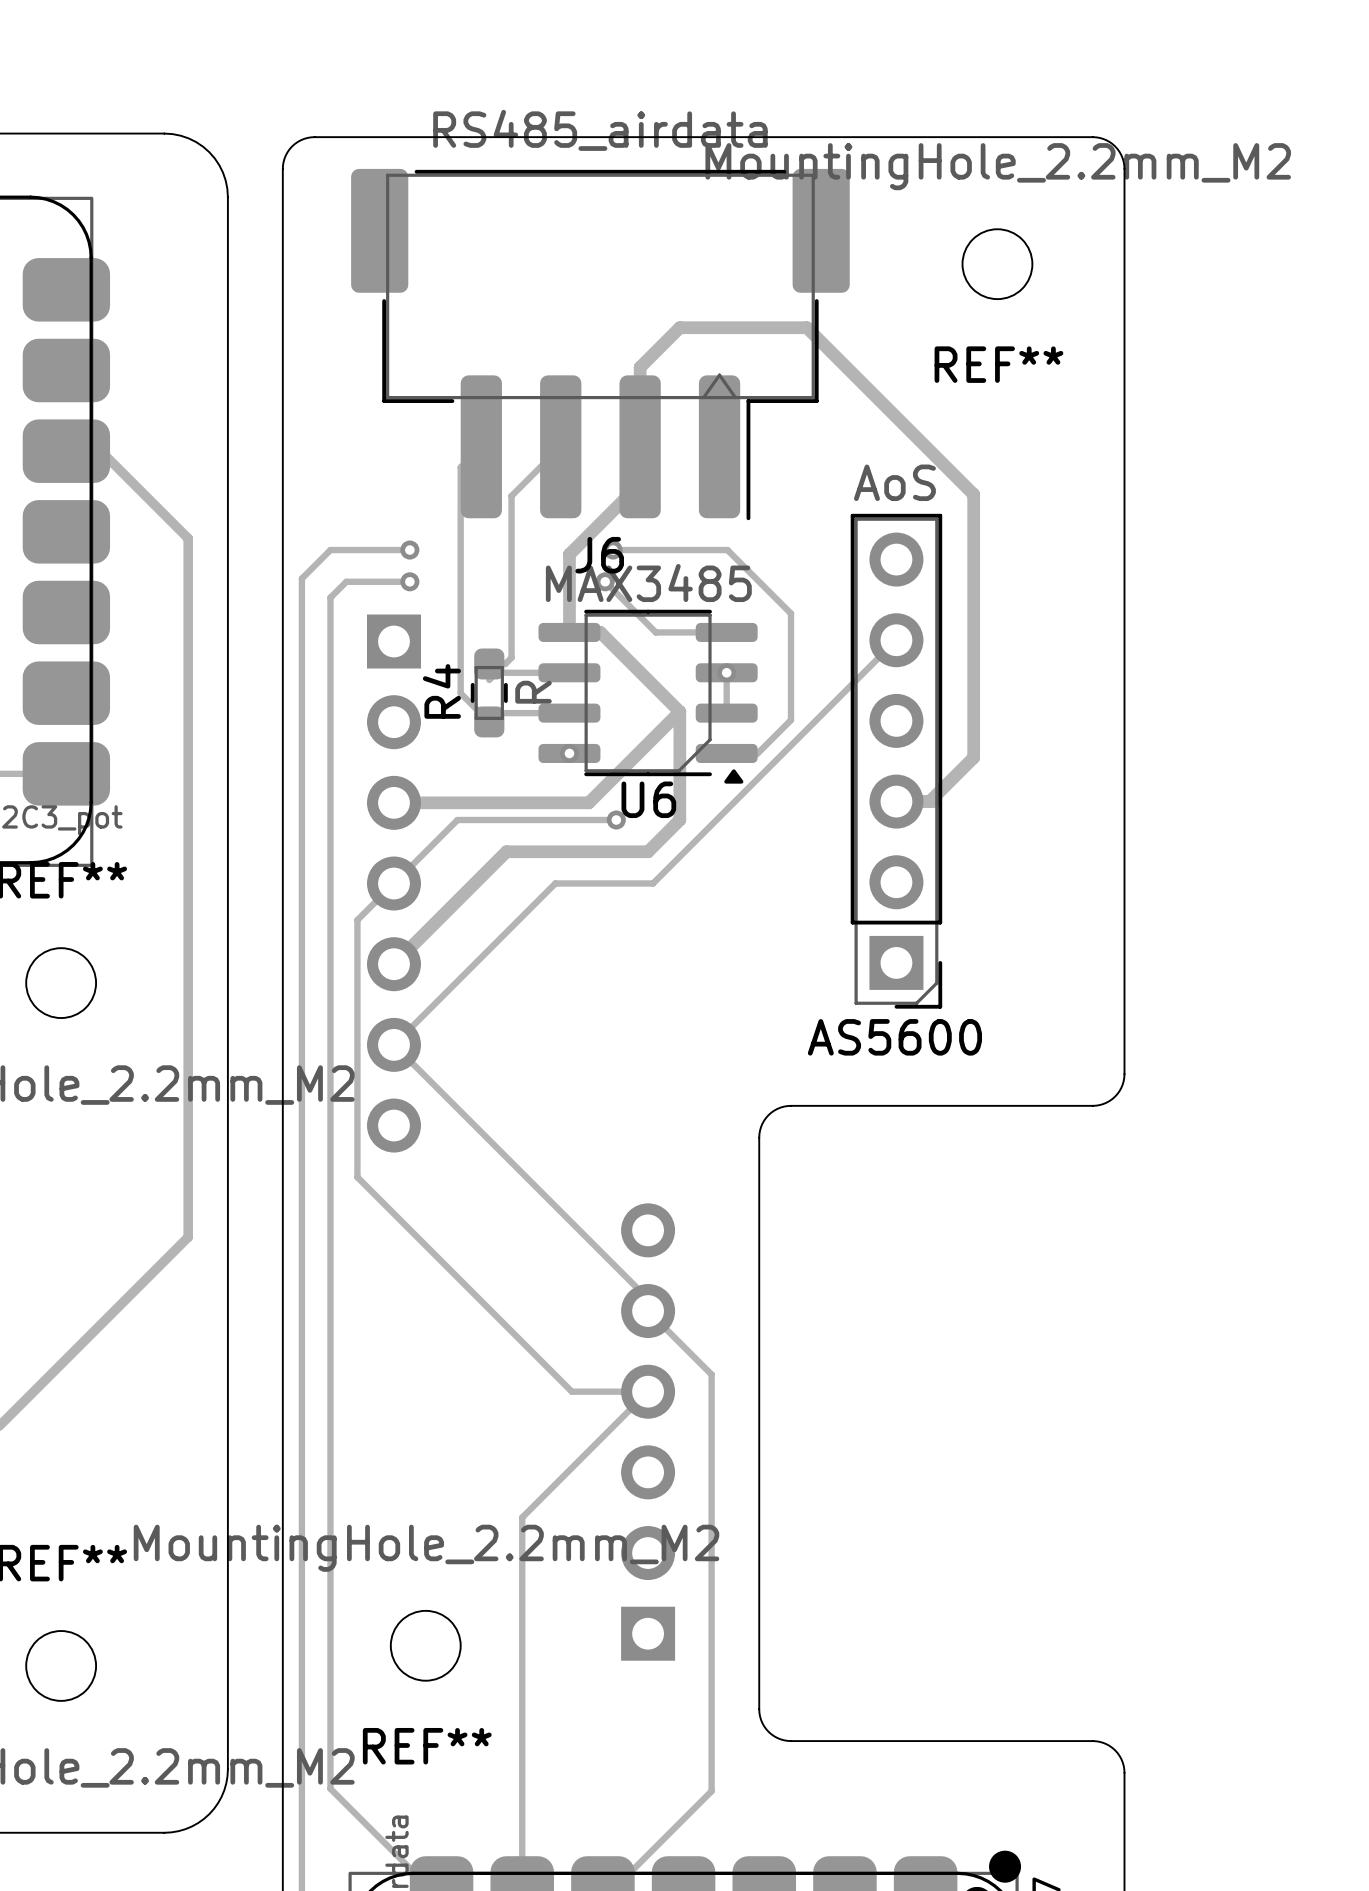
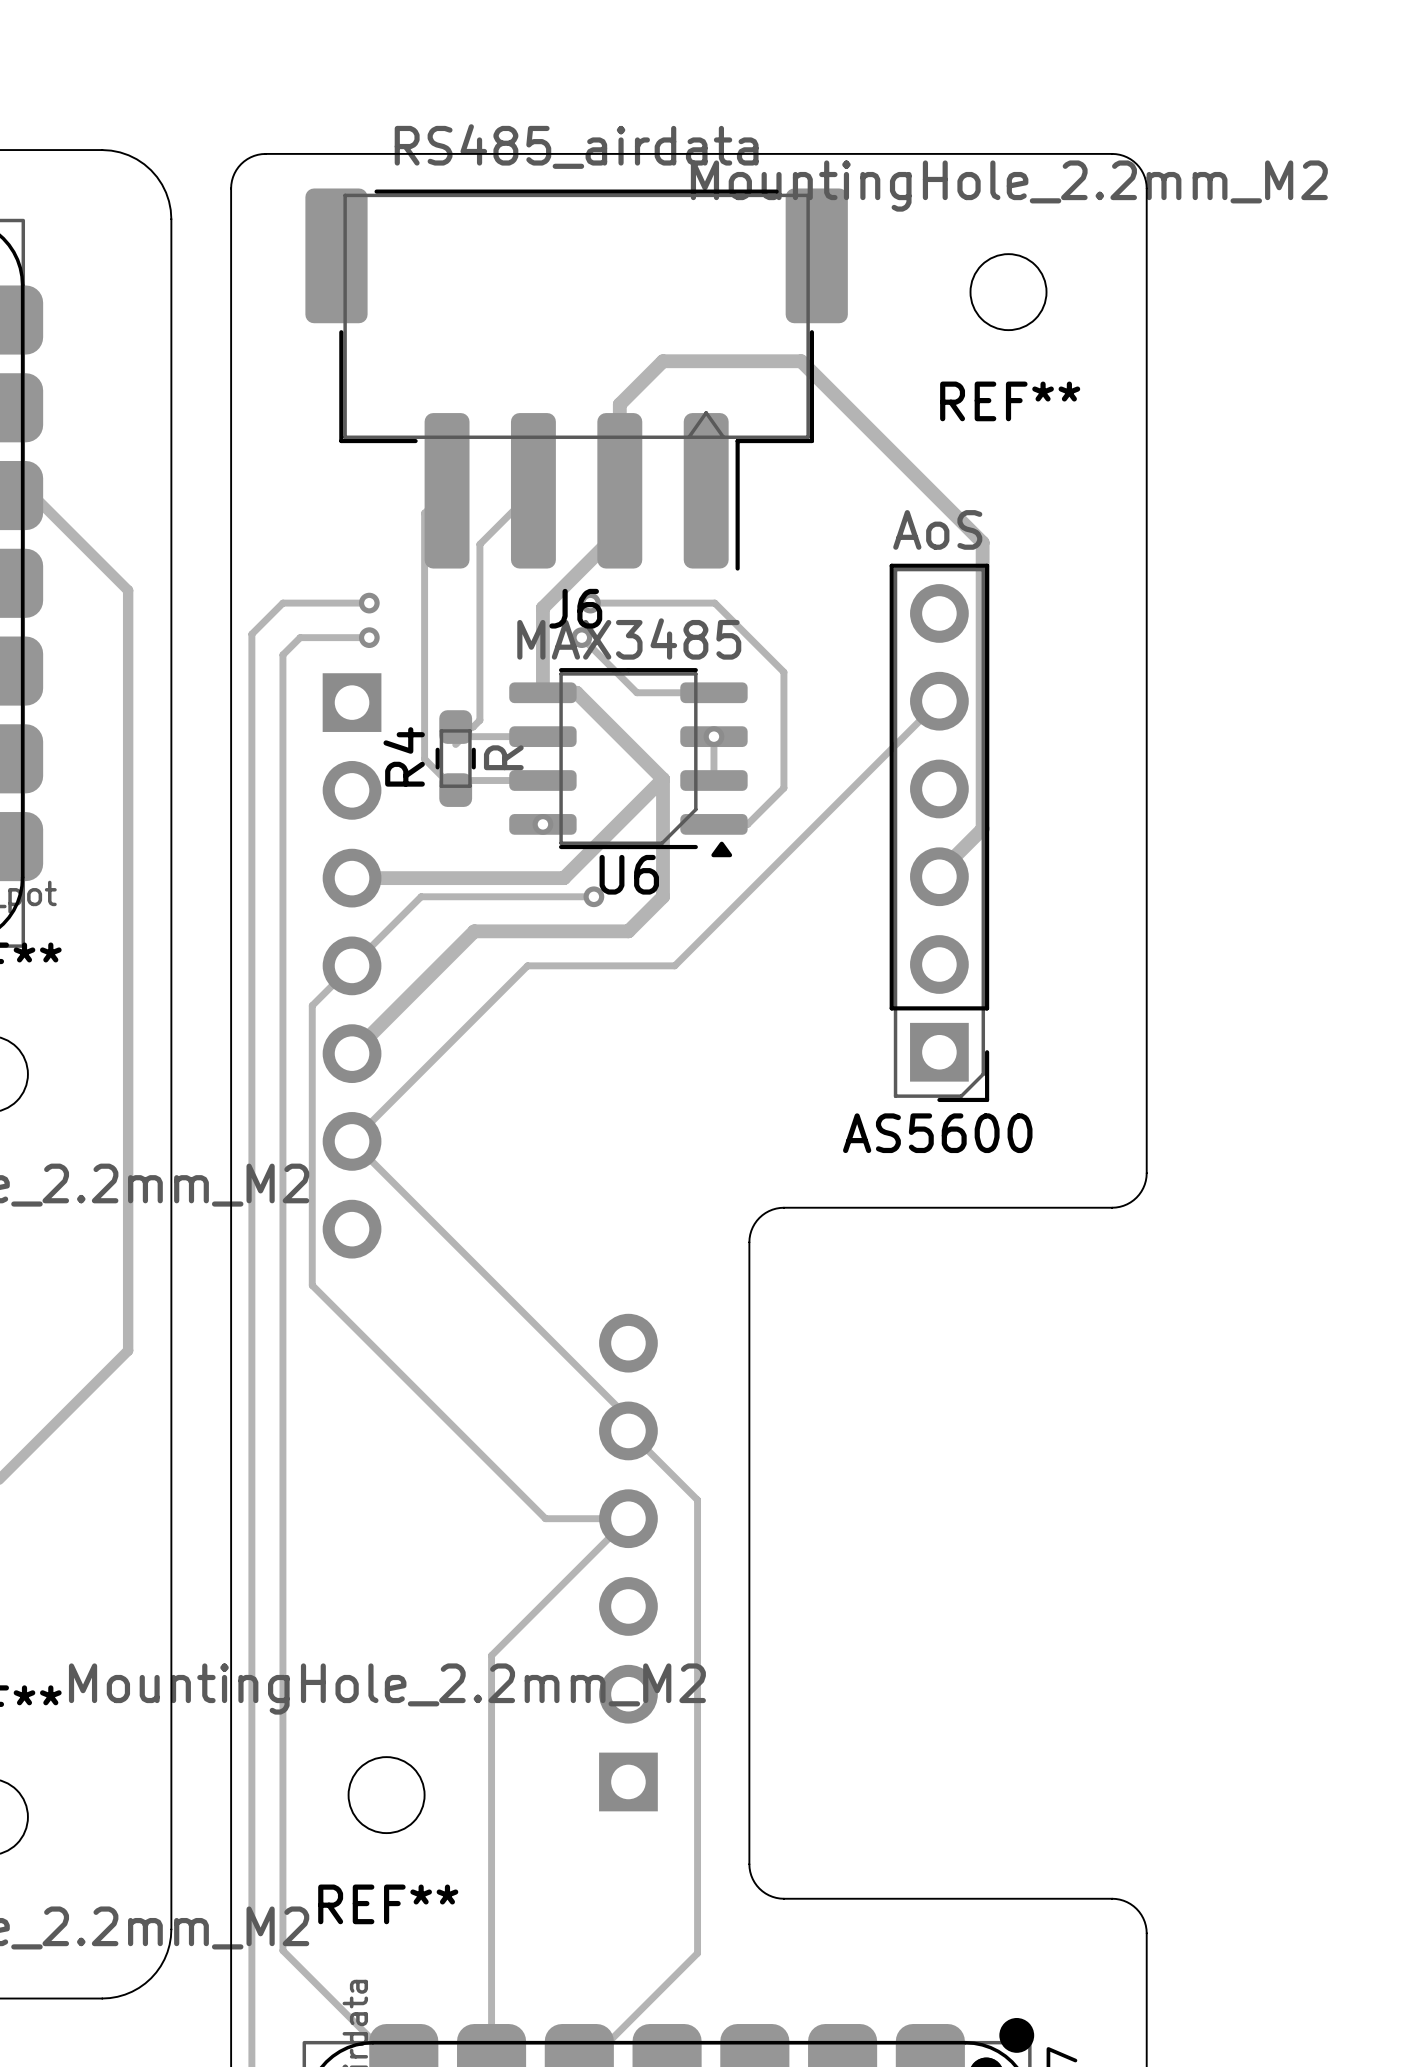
track: (896, 640) (653, 883) -> (939, 701) (674, 965) (633, 965)
AS5600 position: (896, 761) -> (939, 832)

